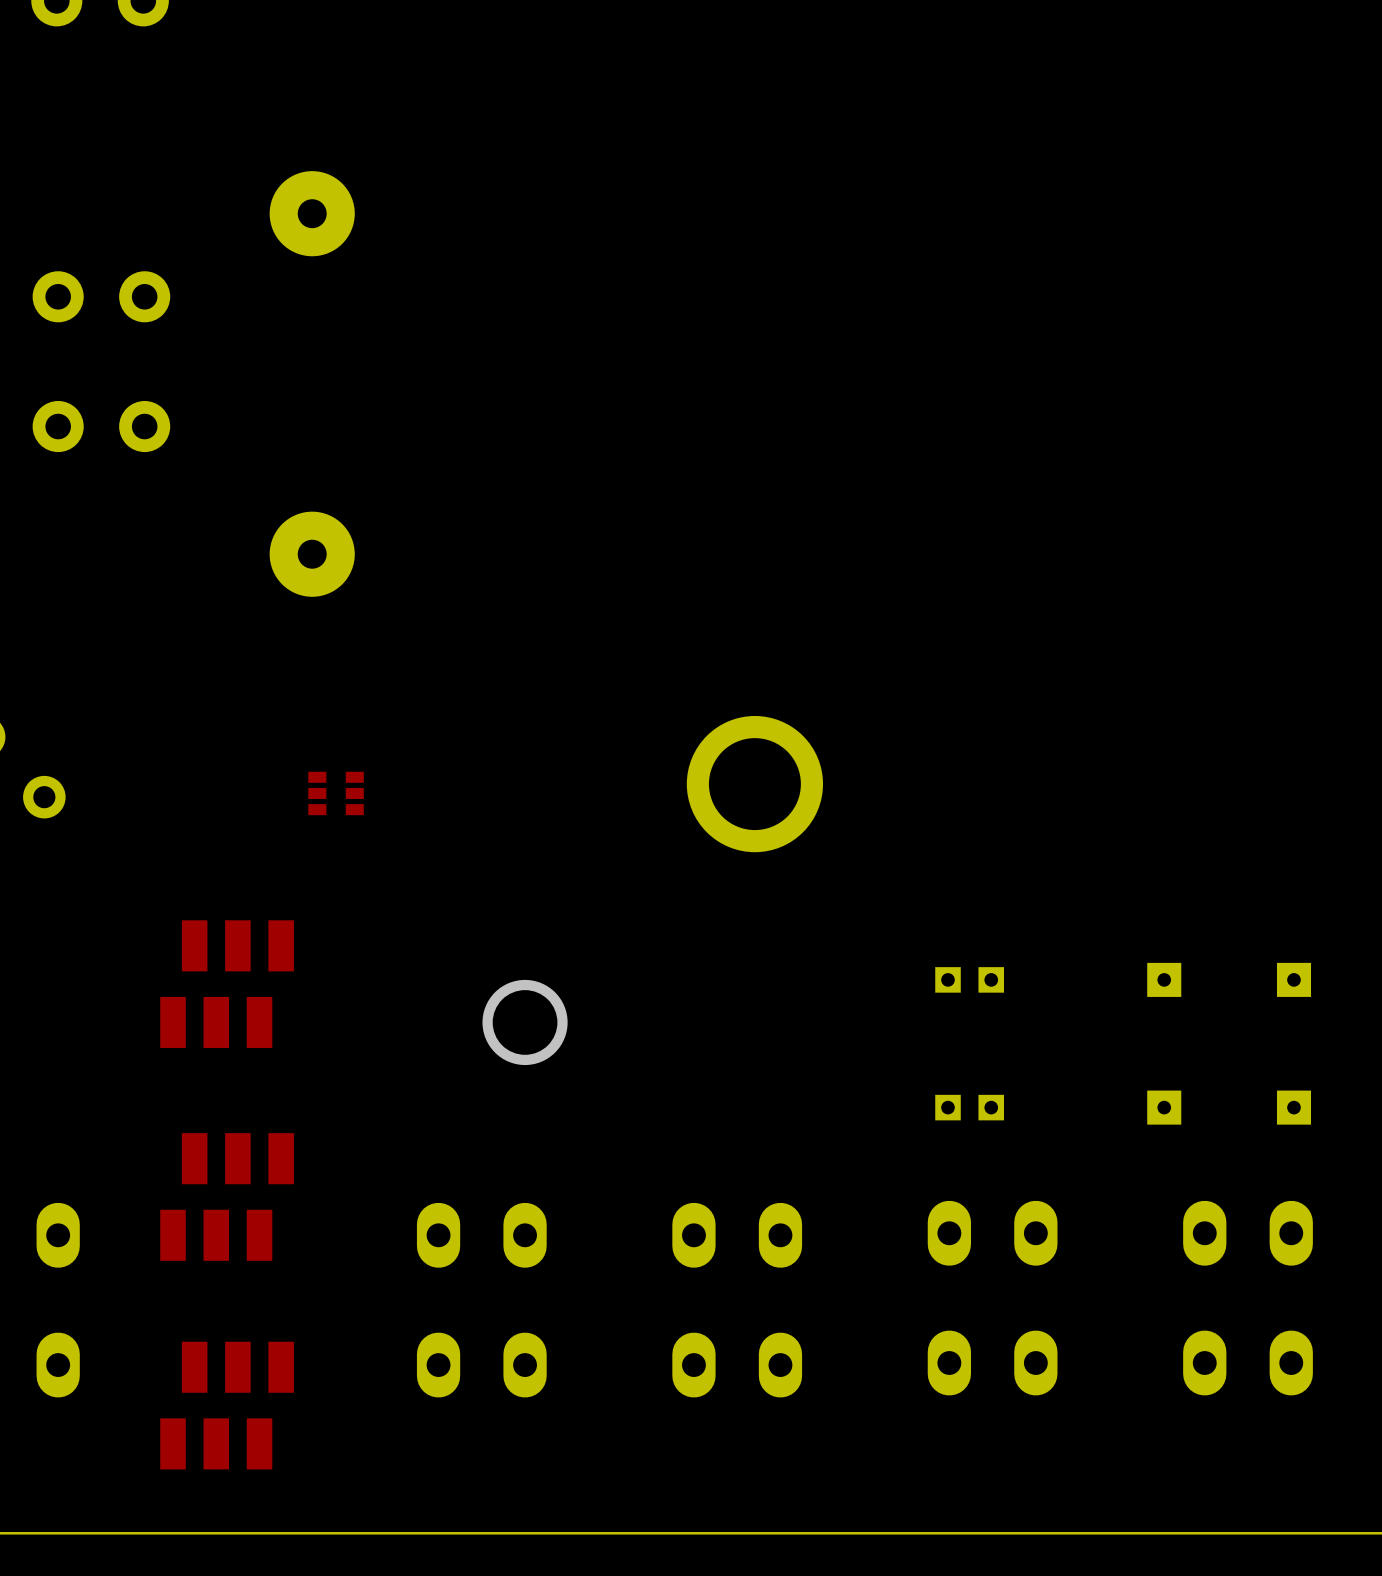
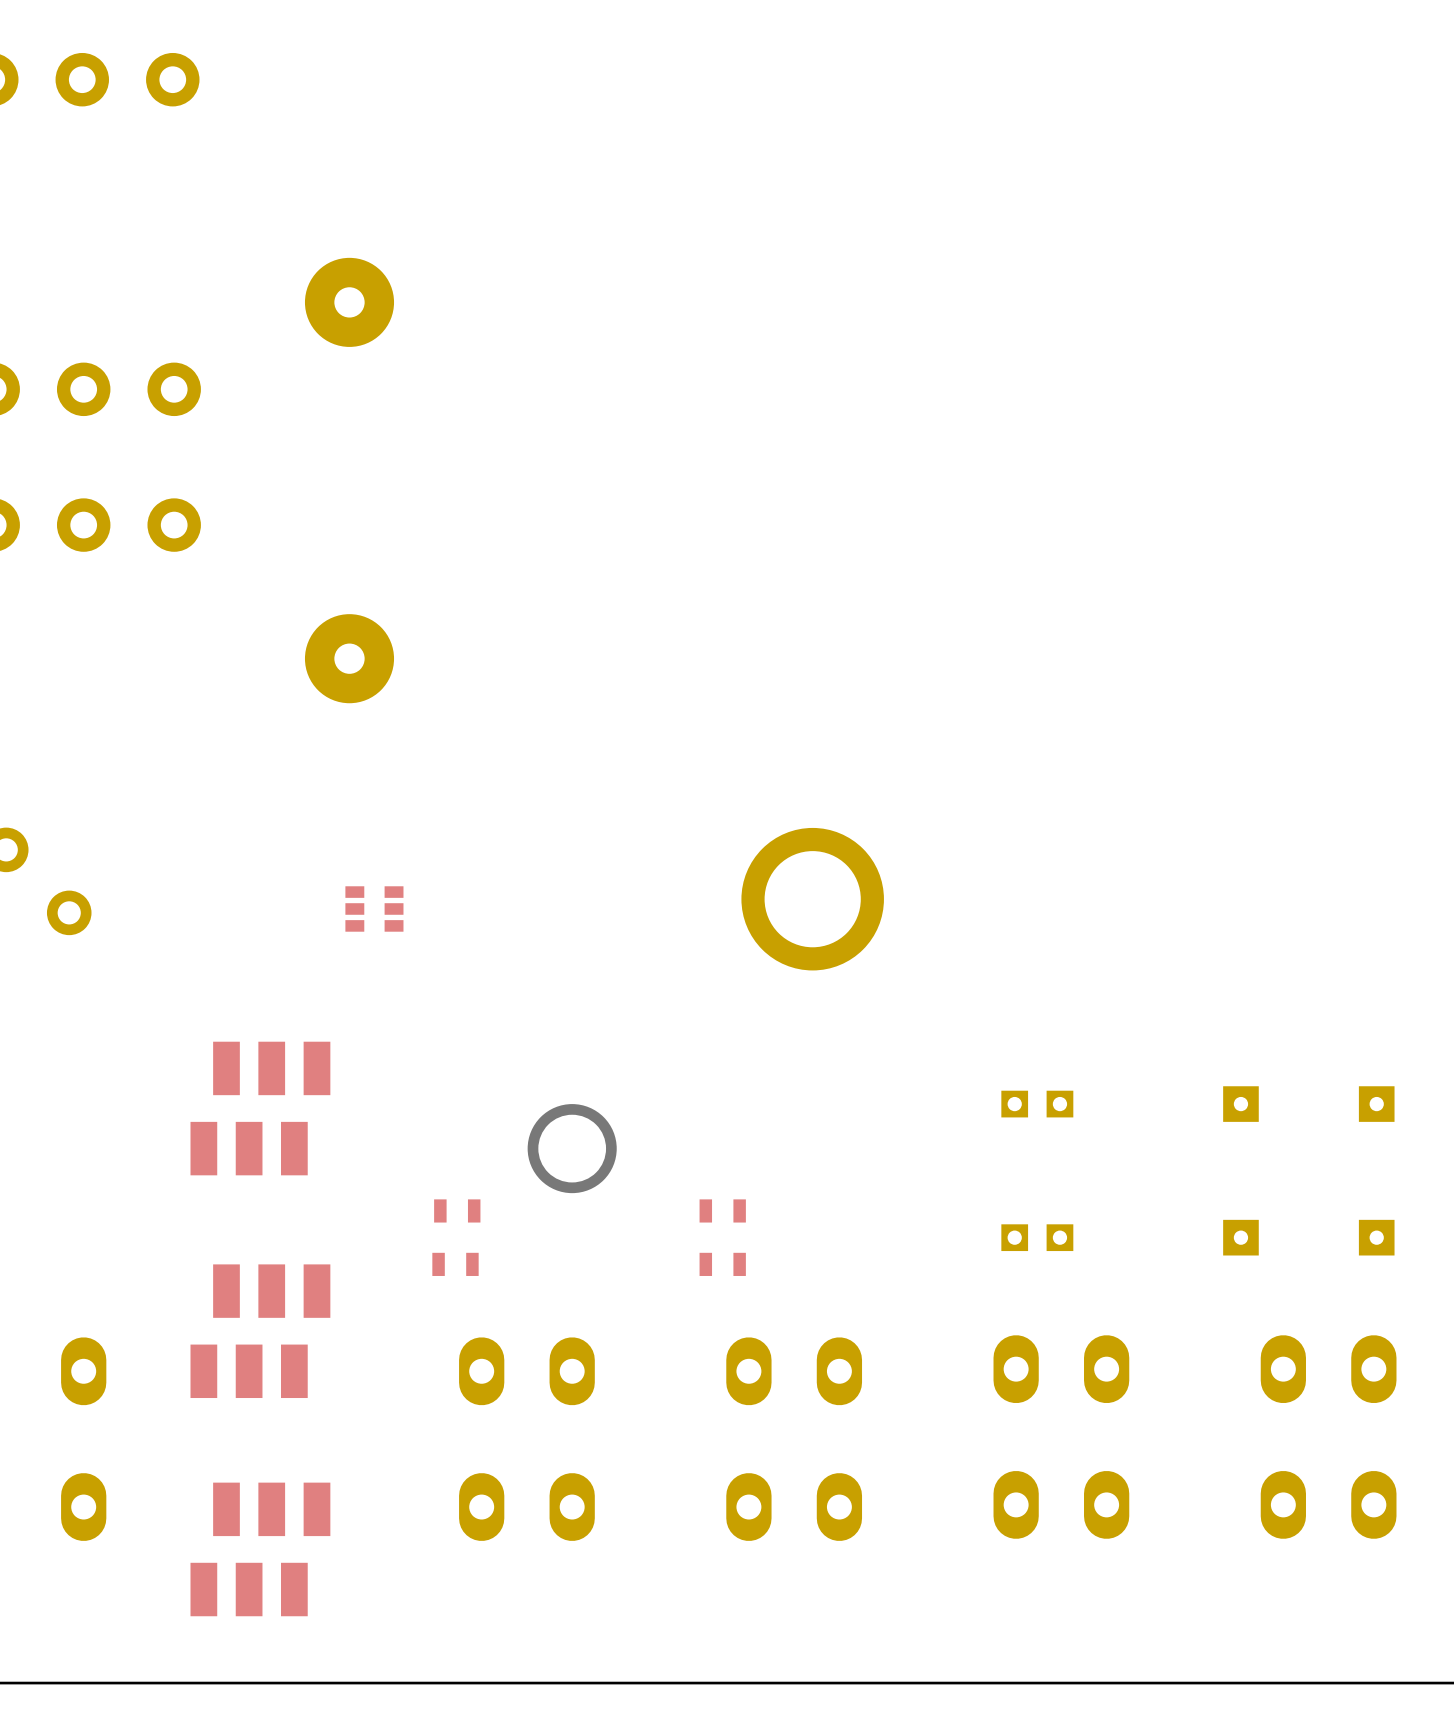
part: none -> (457, 1210)
part: none -> (722, 1210)
part: none -> (455, 1264)
part: none -> (722, 1264)

